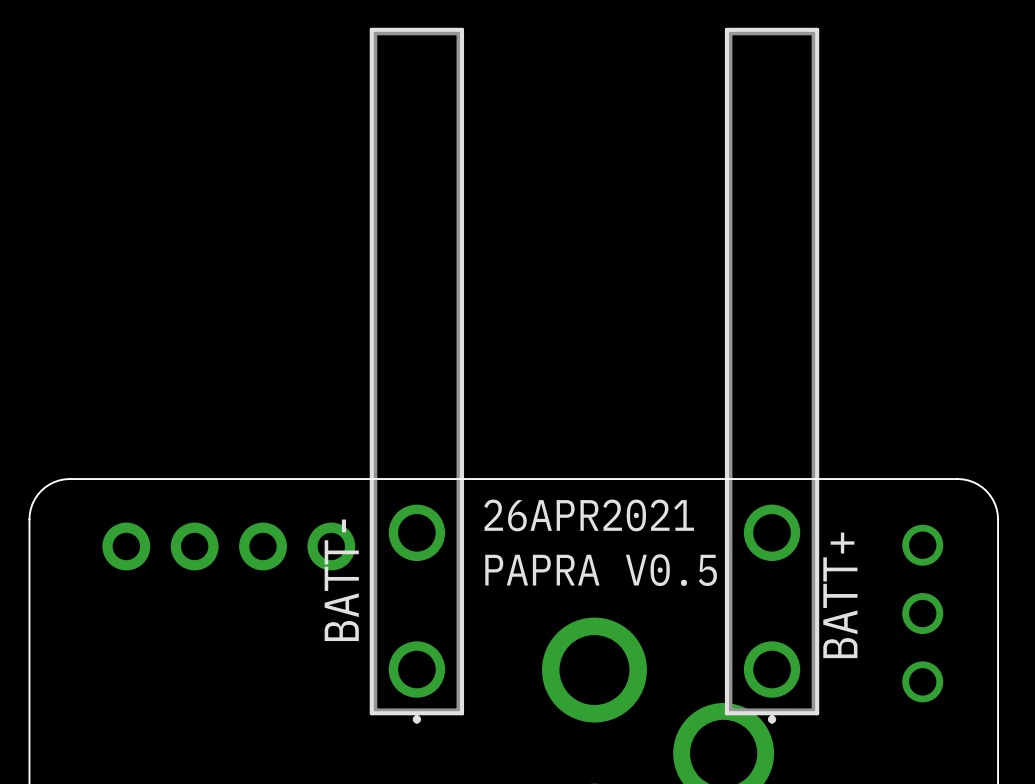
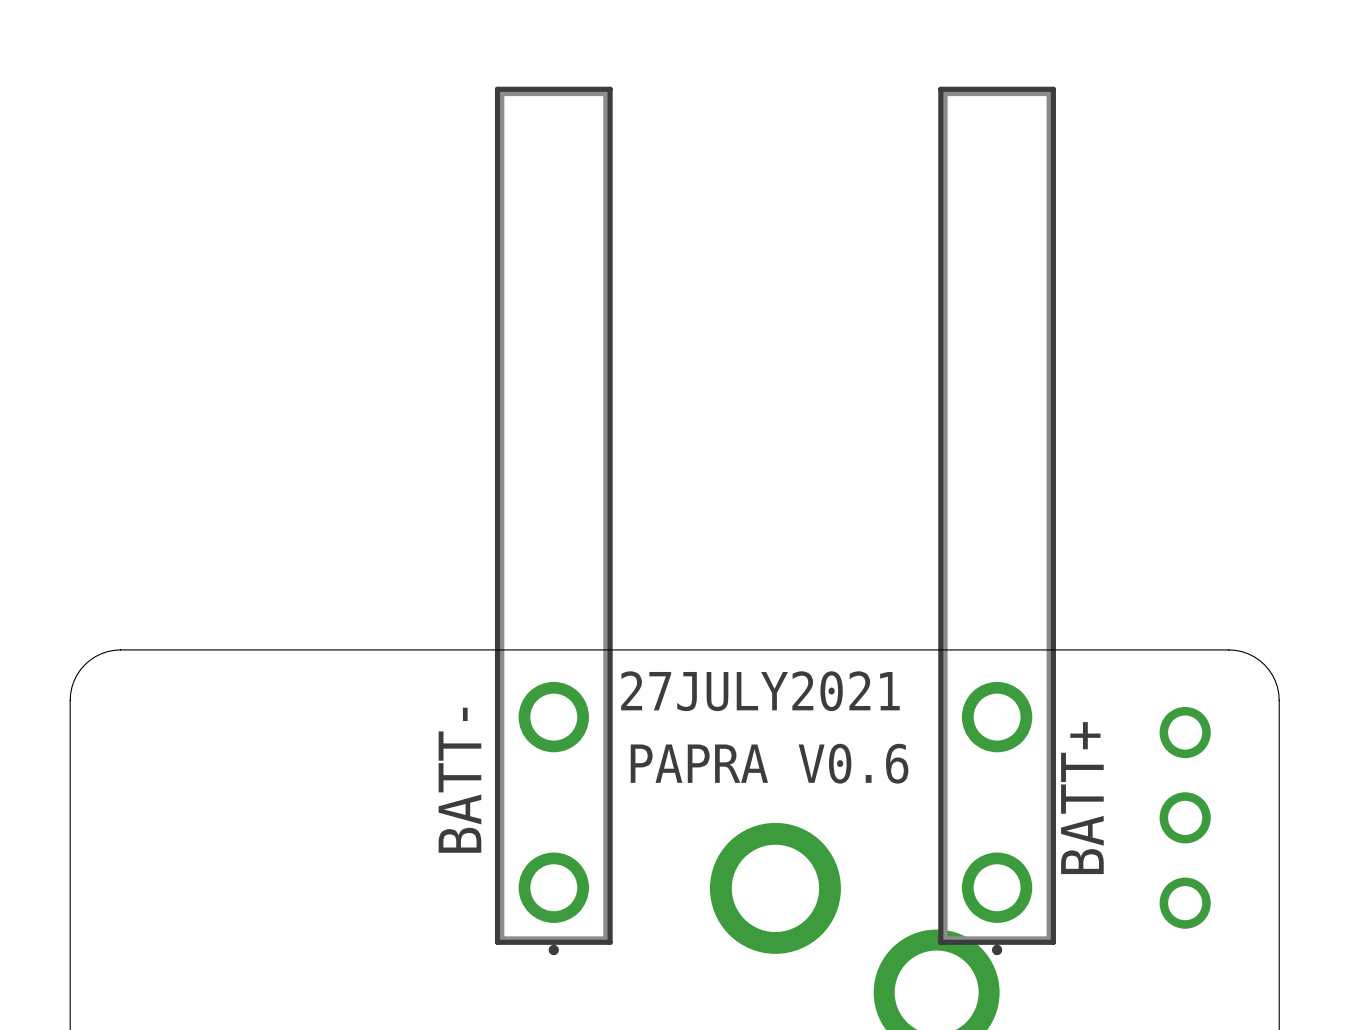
text: 26APR2021 (589, 515) -> 27JULY2021 (760, 691)
part: (228, 546) -> none
text: PAPRA V0.5 (601, 570) -> PAPRA V0.6 (769, 763)

